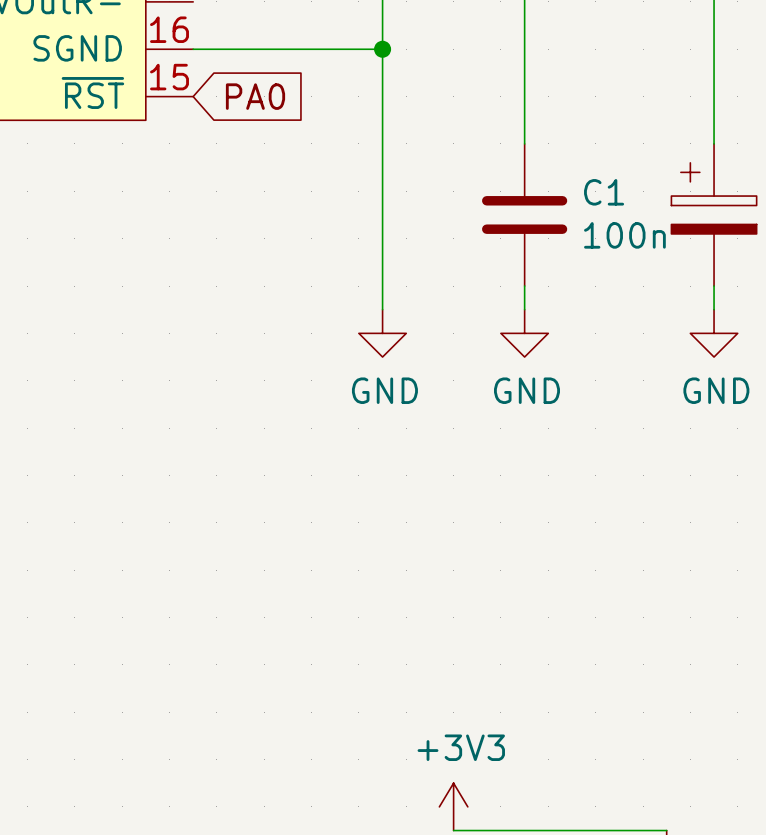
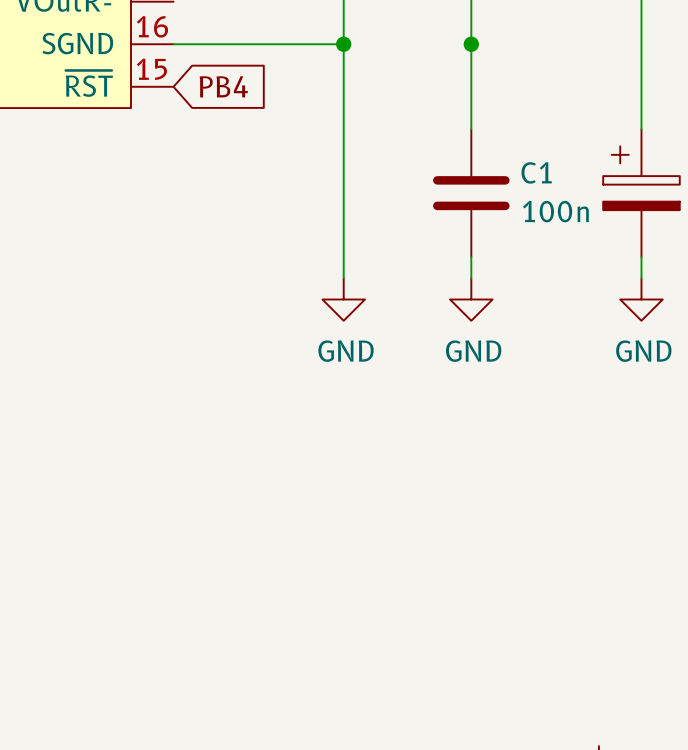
junction: none -> (471, 44)
global label: PA0 (255, 96) -> PB4 (223, 86)
power symbol: +3V3 (453, 806) -> none
wire: (453, 830) (666, 830) -> none

